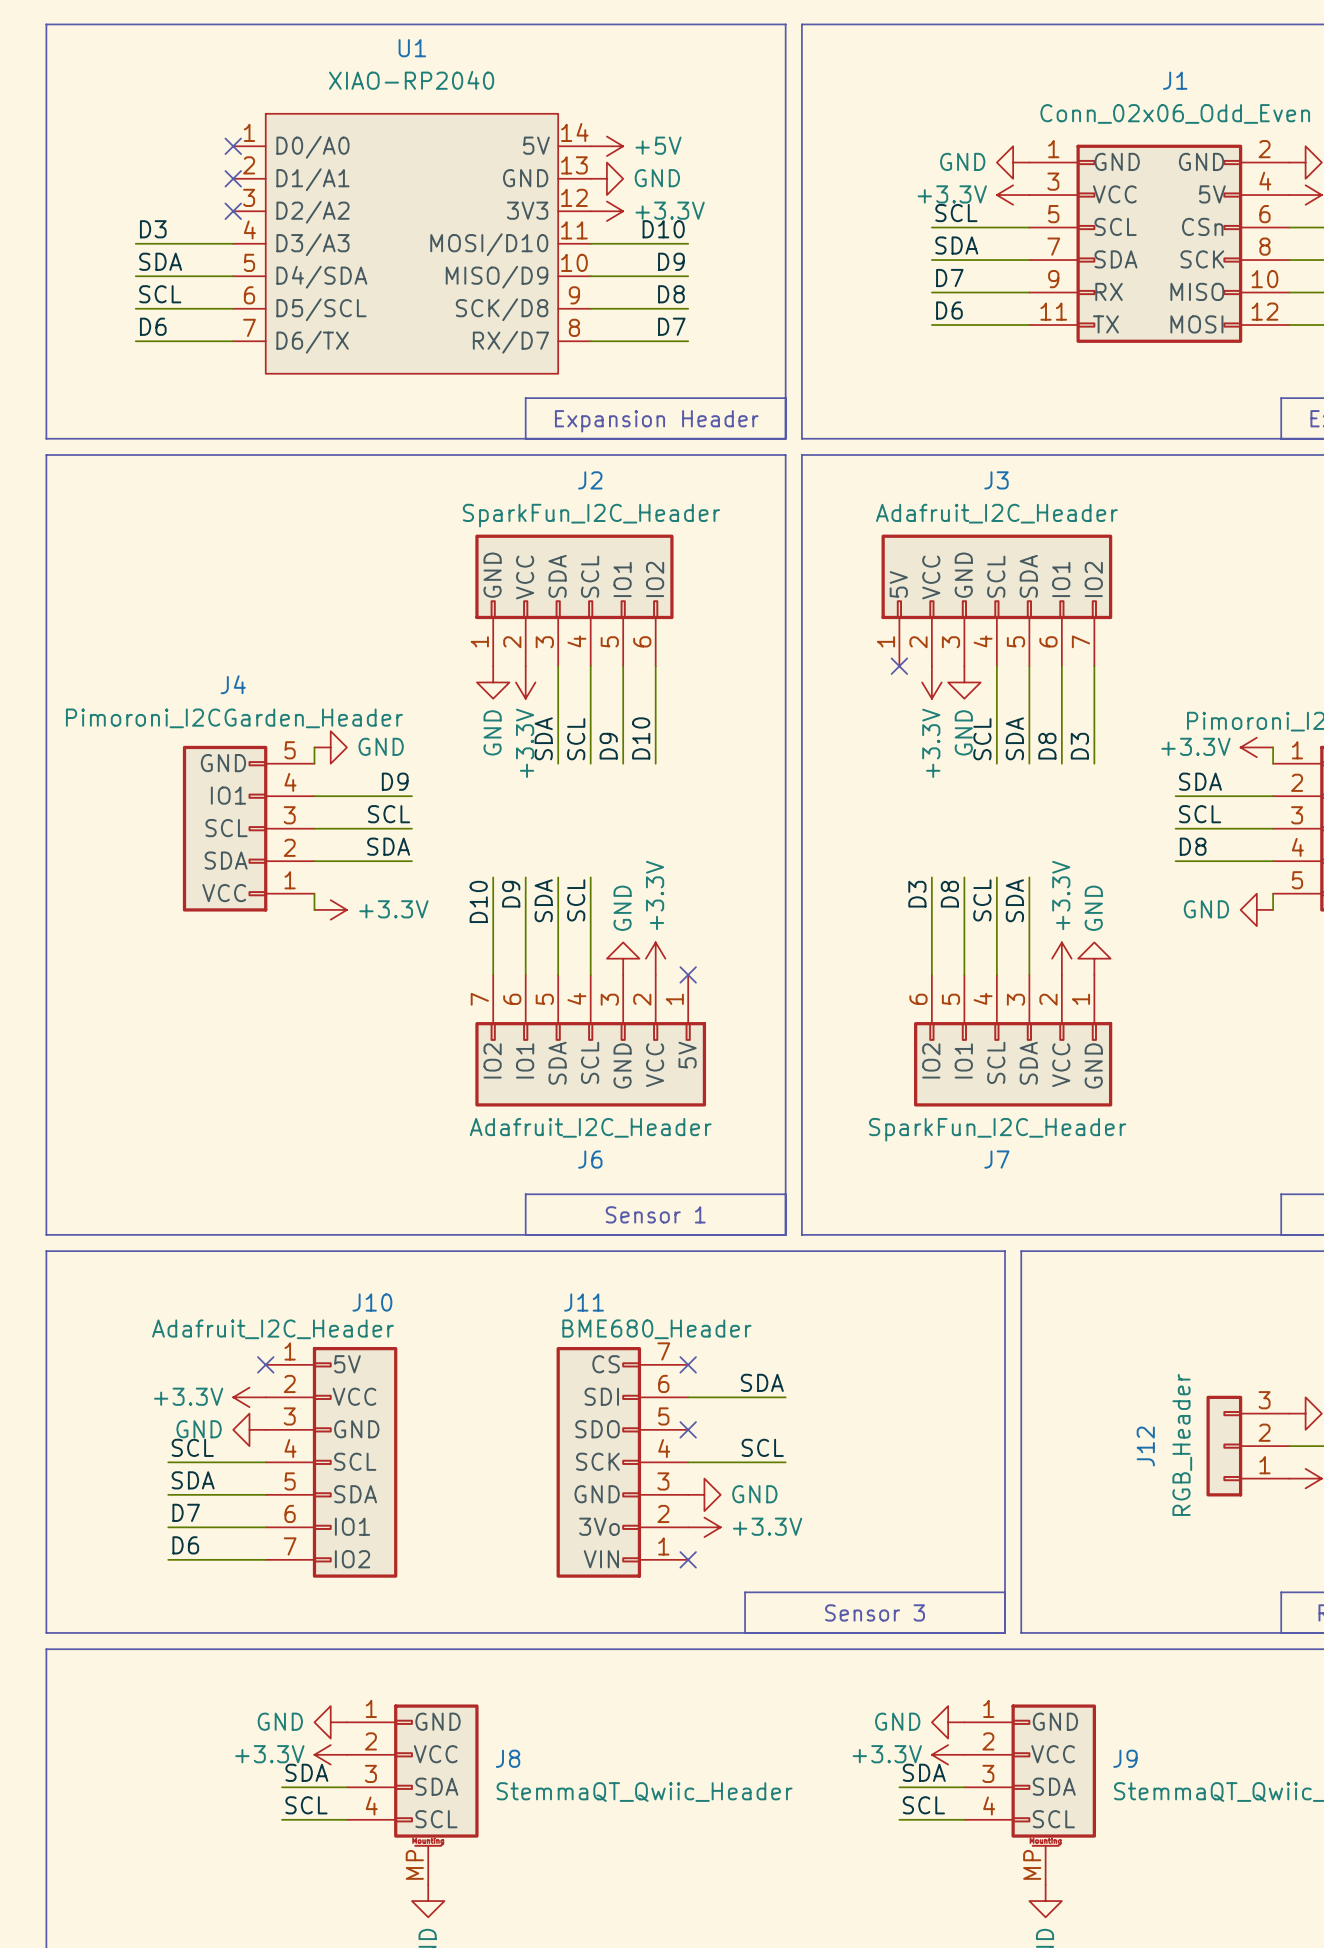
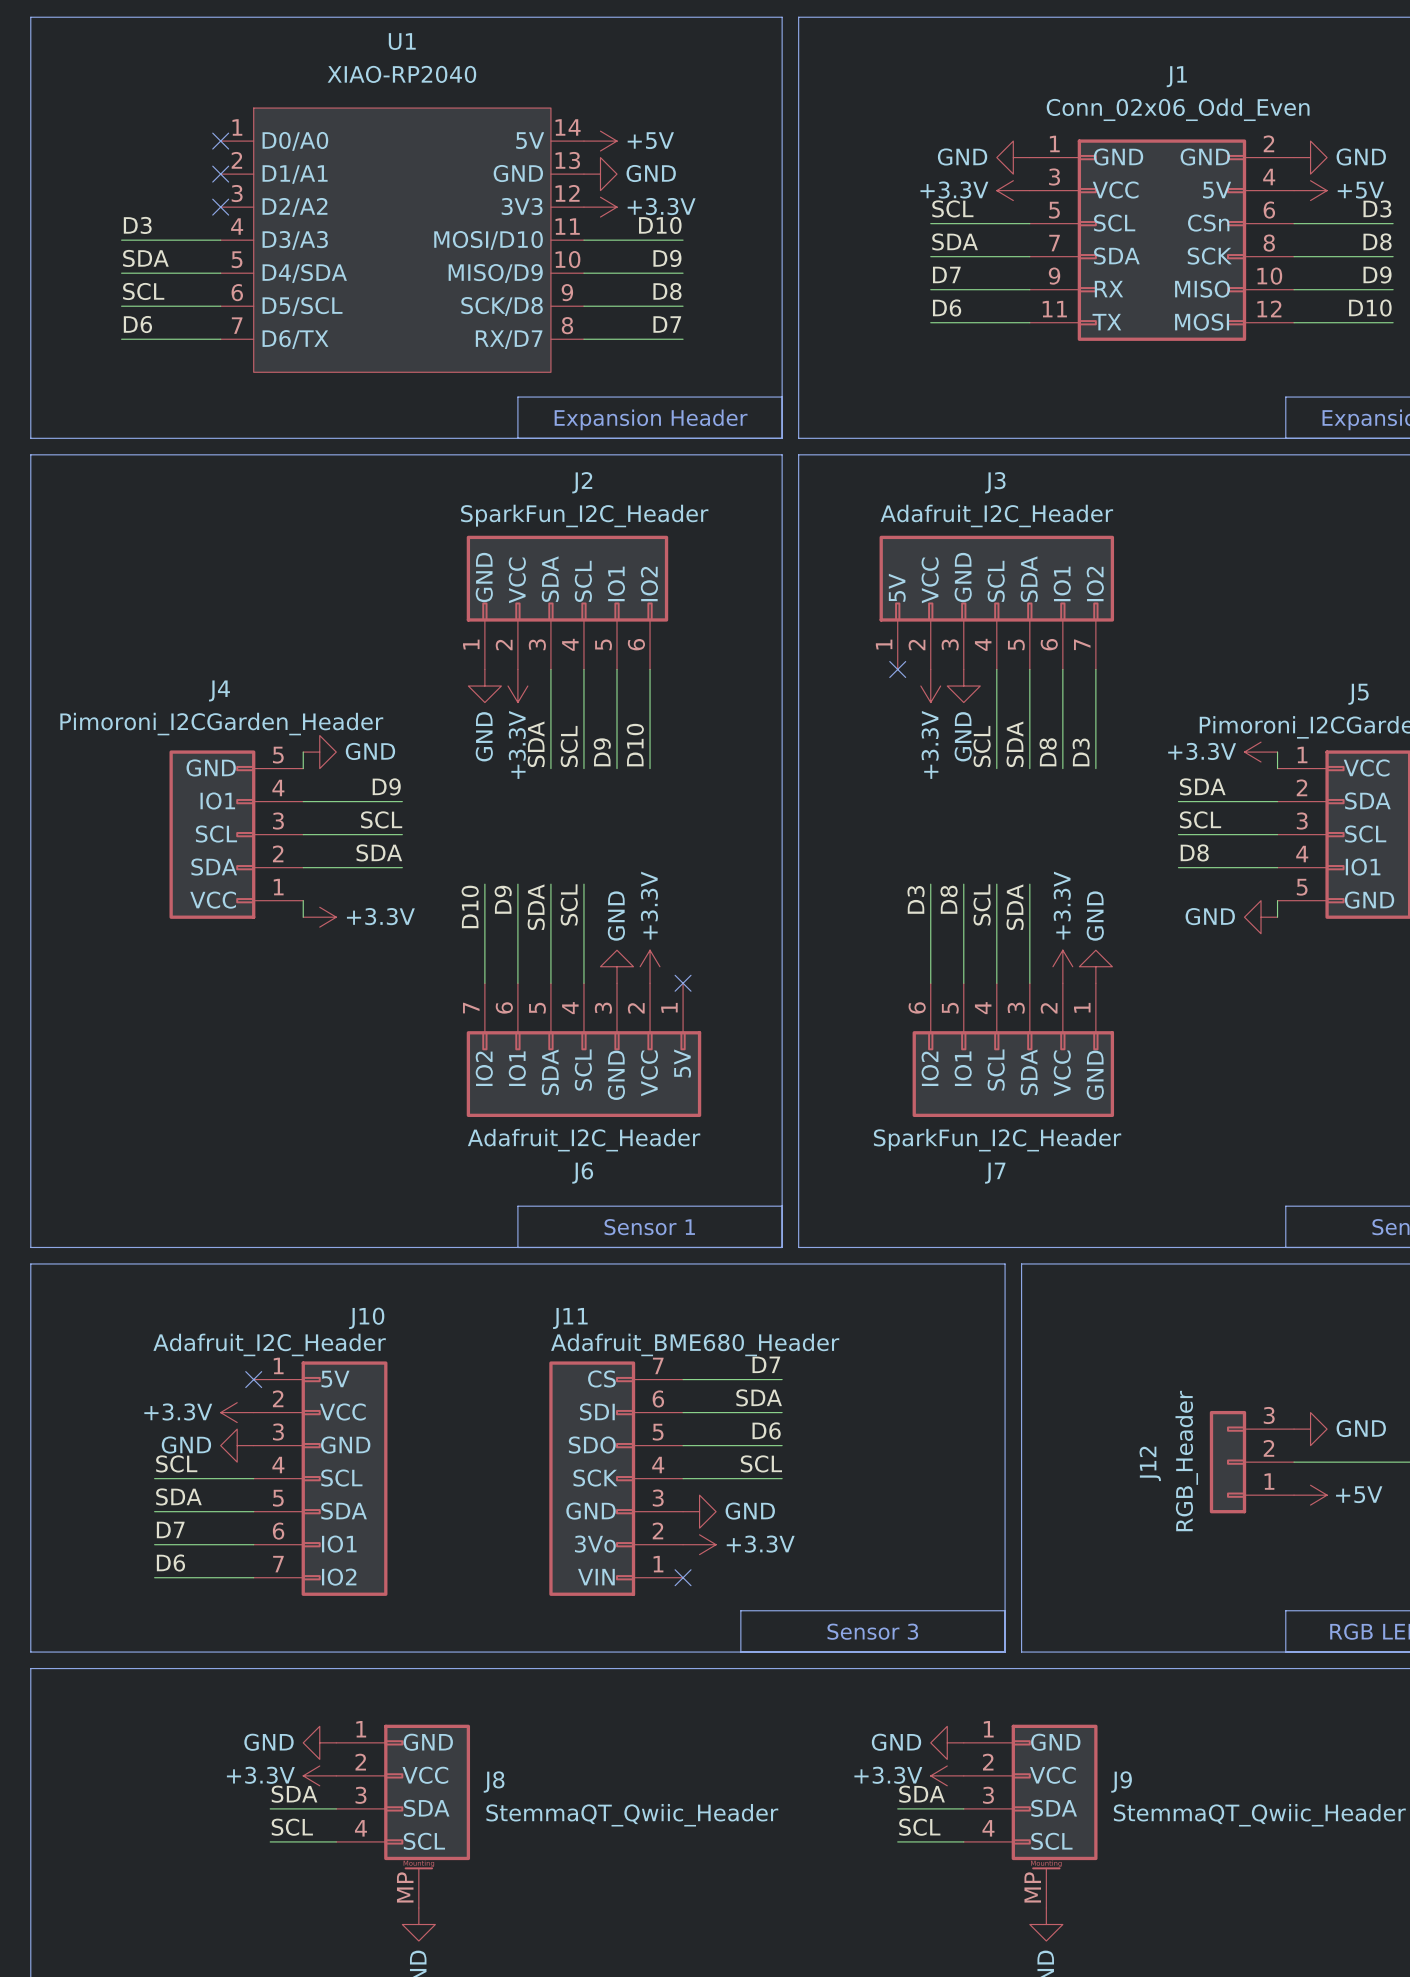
J11 value: BME680_Header (656, 1329) -> Adafruit_BME680_Header (695, 1344)
label: none -> D7 (766, 1364)
wire: none -> (683, 1379) (782, 1379)
no-connect mark: (688, 1364) -> none
label: none -> D6 (766, 1430)
wire: none -> (683, 1445) (782, 1445)
no-connect mark: (688, 1429) -> none

